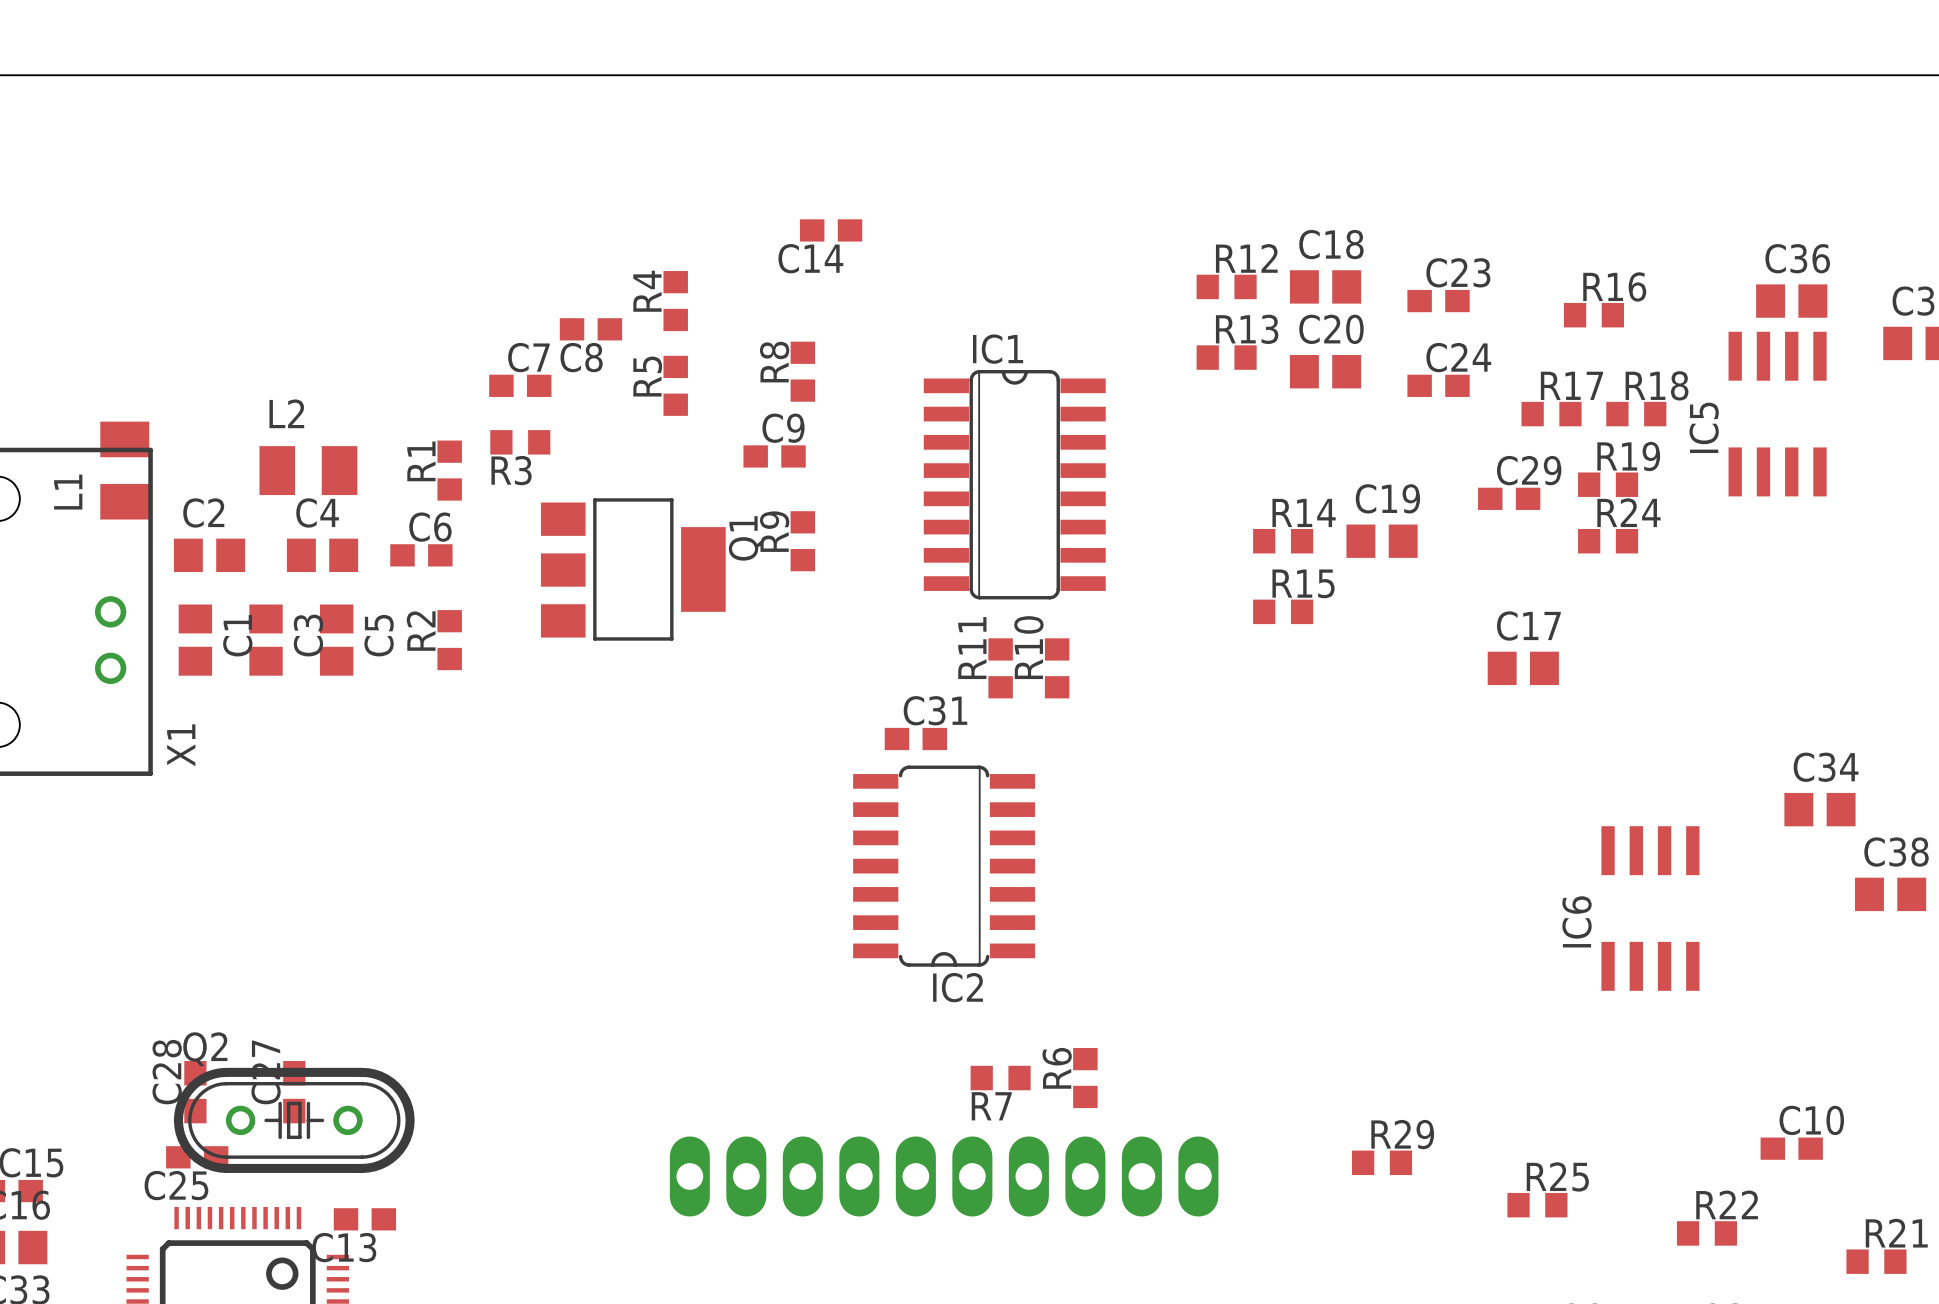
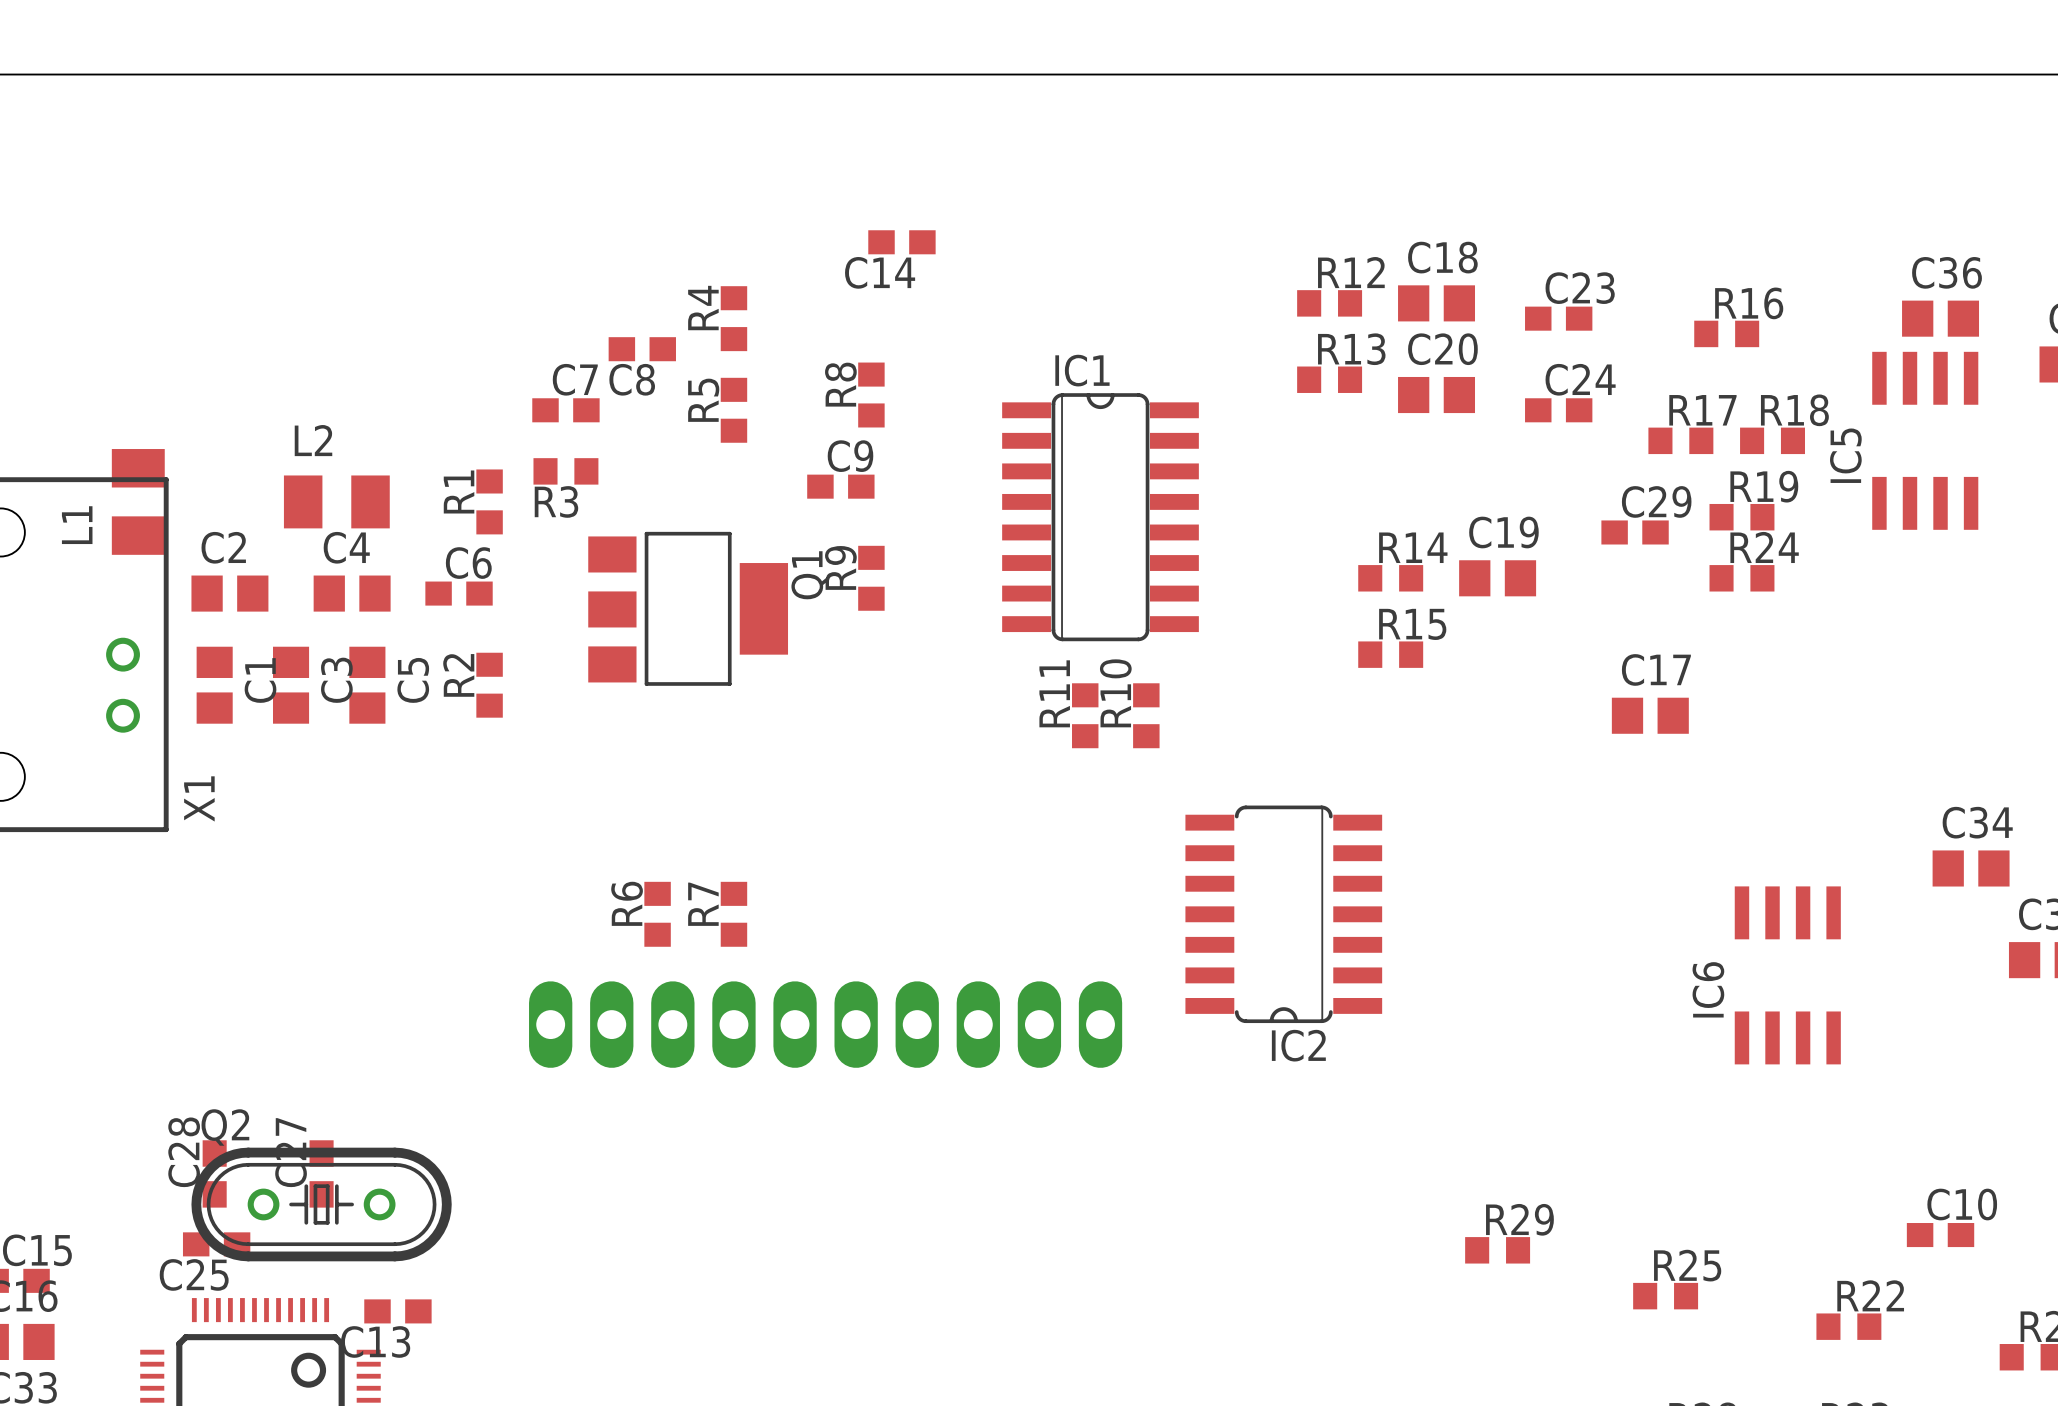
C31: (915, 738) -> none
IC2 position: (944, 866) -> (1283, 914)
R7 rotation: 0° (1000, 1078) -> 90° clockwise (733, 914)
R7 position: (1000, 1078) -> (733, 914)
R6 position: (1085, 1078) -> (657, 914)
part position: (944, 1176) -> (825, 1024)

